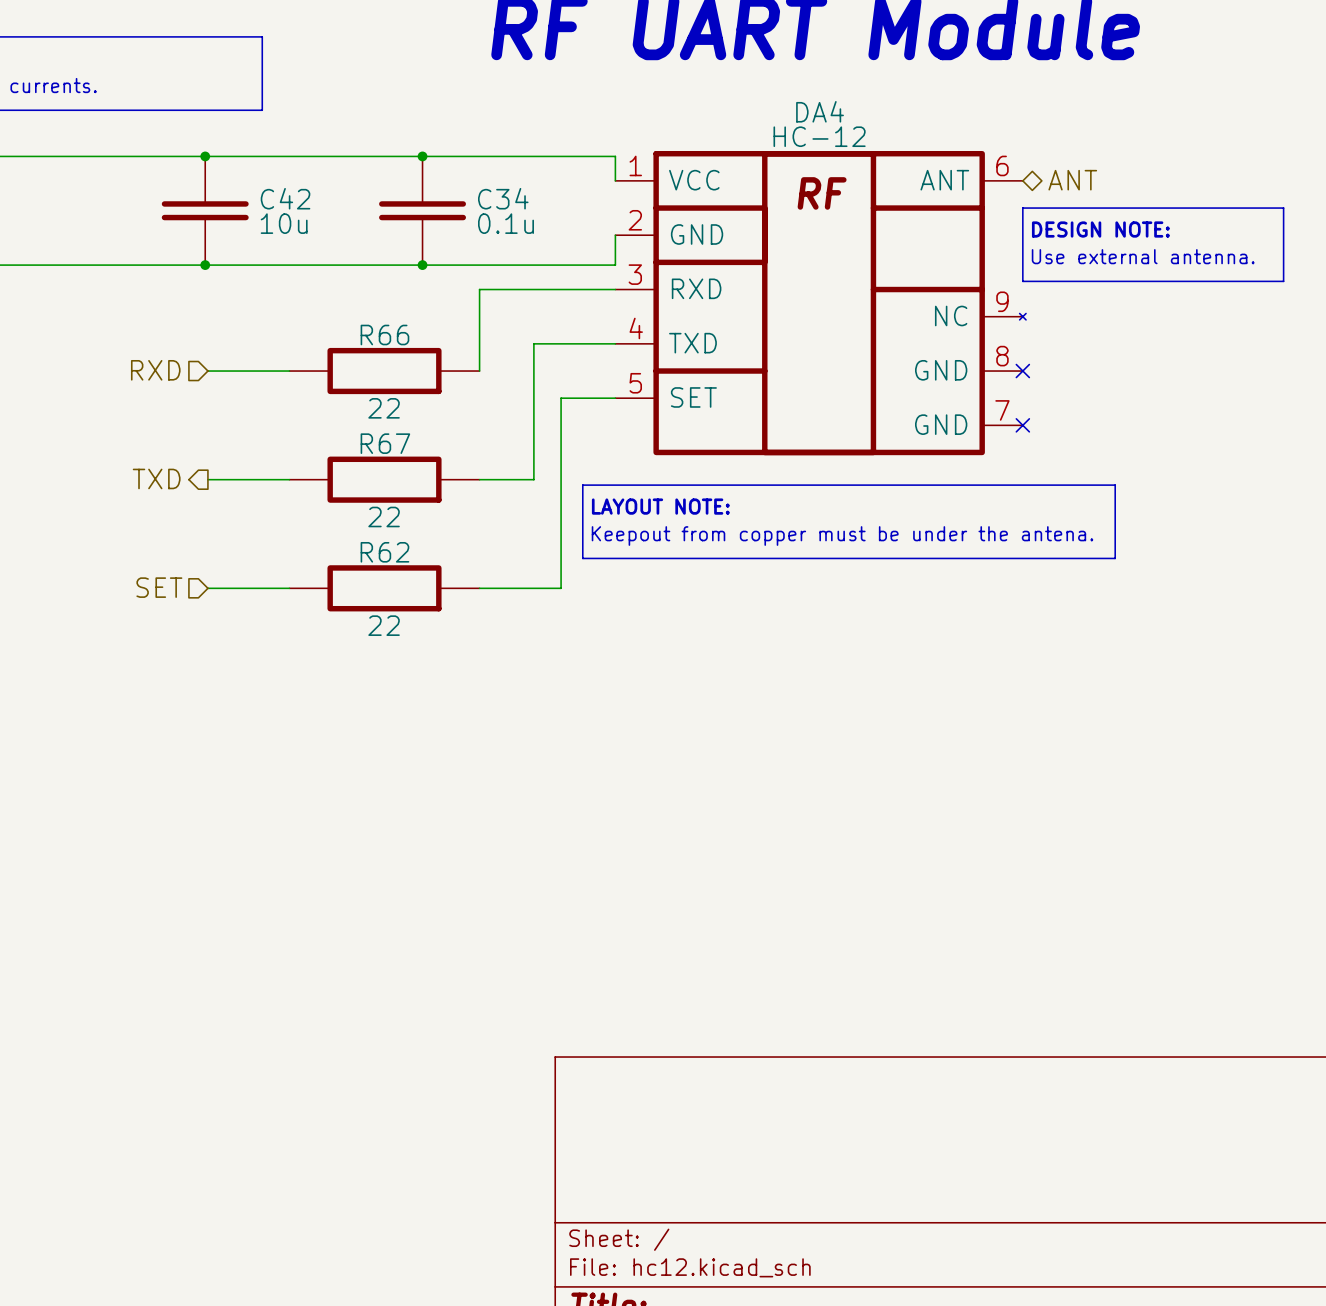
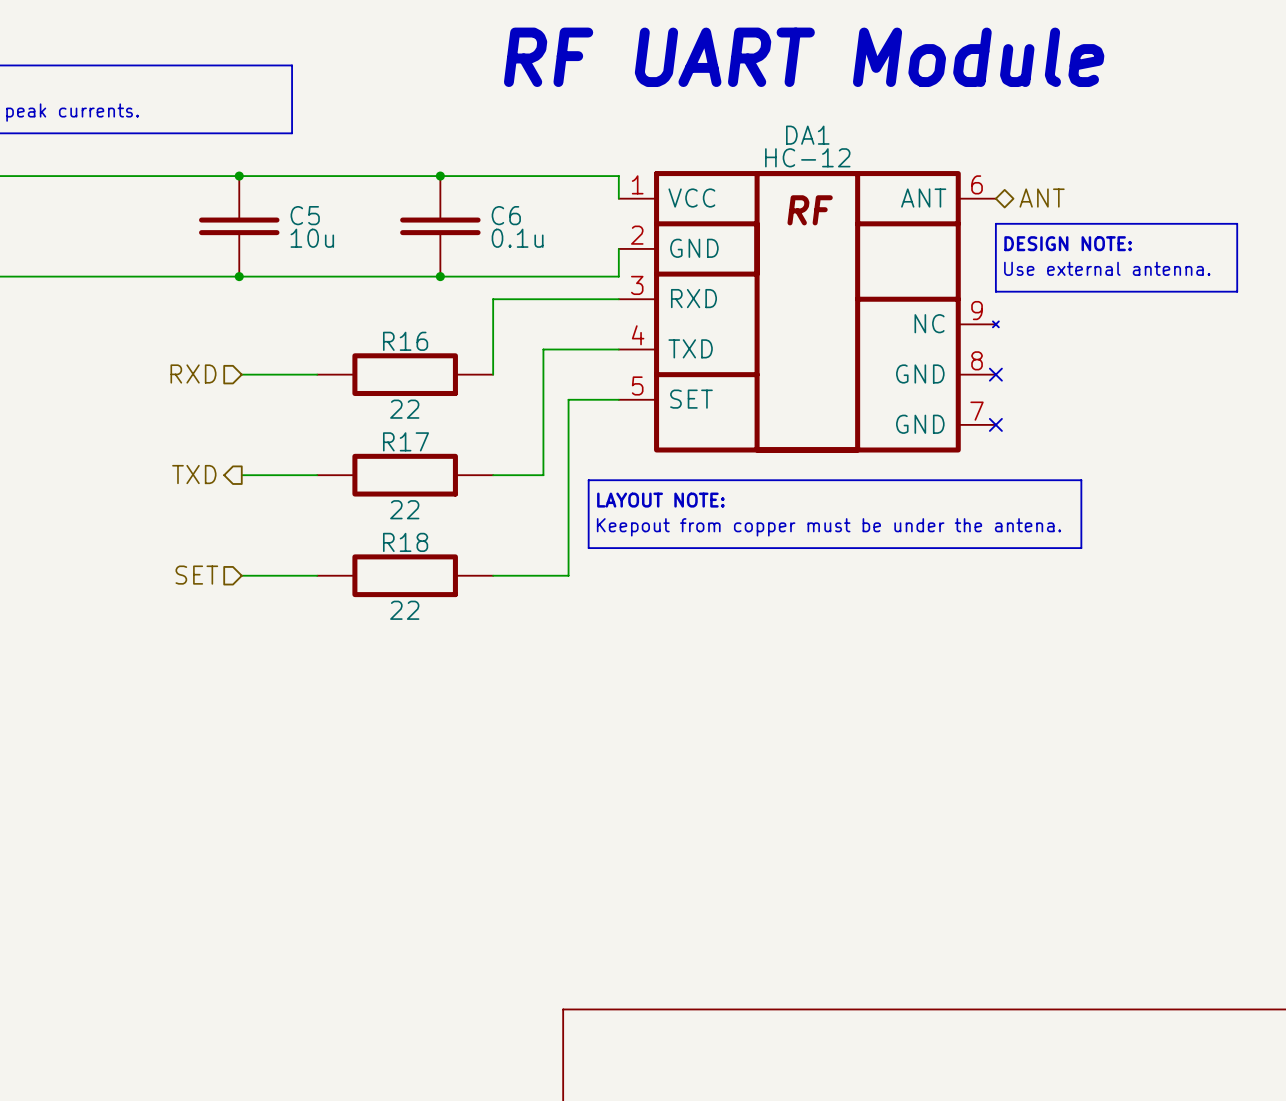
DA4 name: DA4 (820, 111) -> DA1 (807, 135)
C42 name: C42 (285, 198) -> C5 (305, 215)
C34 name: C34 (503, 198) -> C6 (506, 215)
R66 name: R66 (384, 335) -> R16 (405, 341)
R67 name: R67 (385, 443) -> R17 (406, 441)
R62 name: R62 (384, 552) -> R18 (405, 542)

